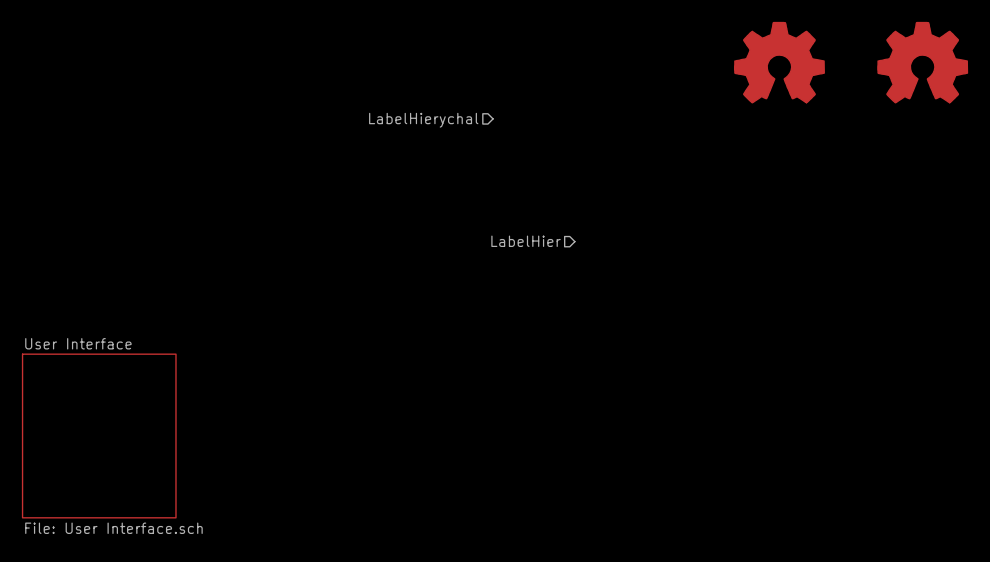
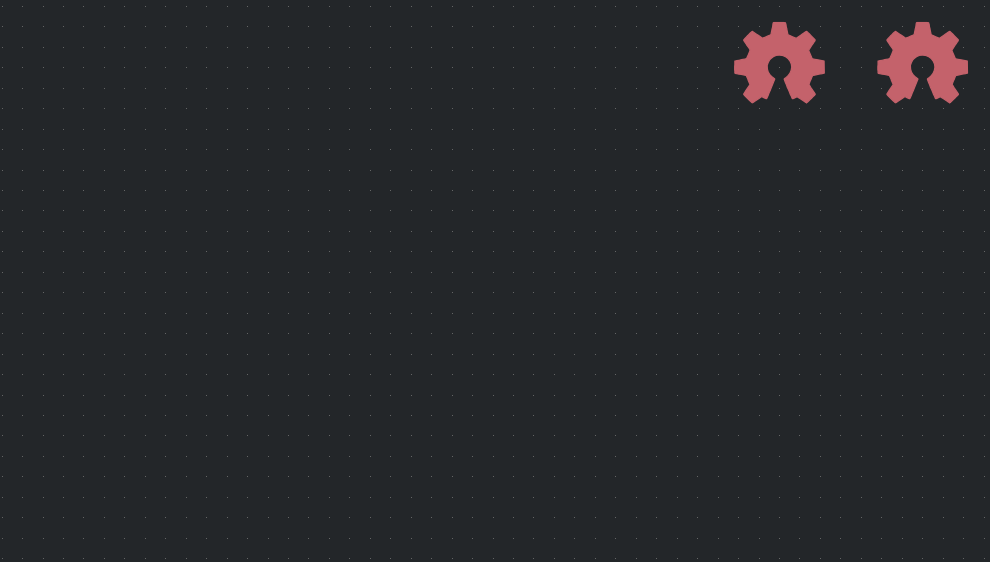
hierarchical label: LabelHierychal (423, 120) -> none
hierarchical label: LabelHier (526, 241) -> none
sheet User Interface: File: User Interface.sch (99, 435) -> none

